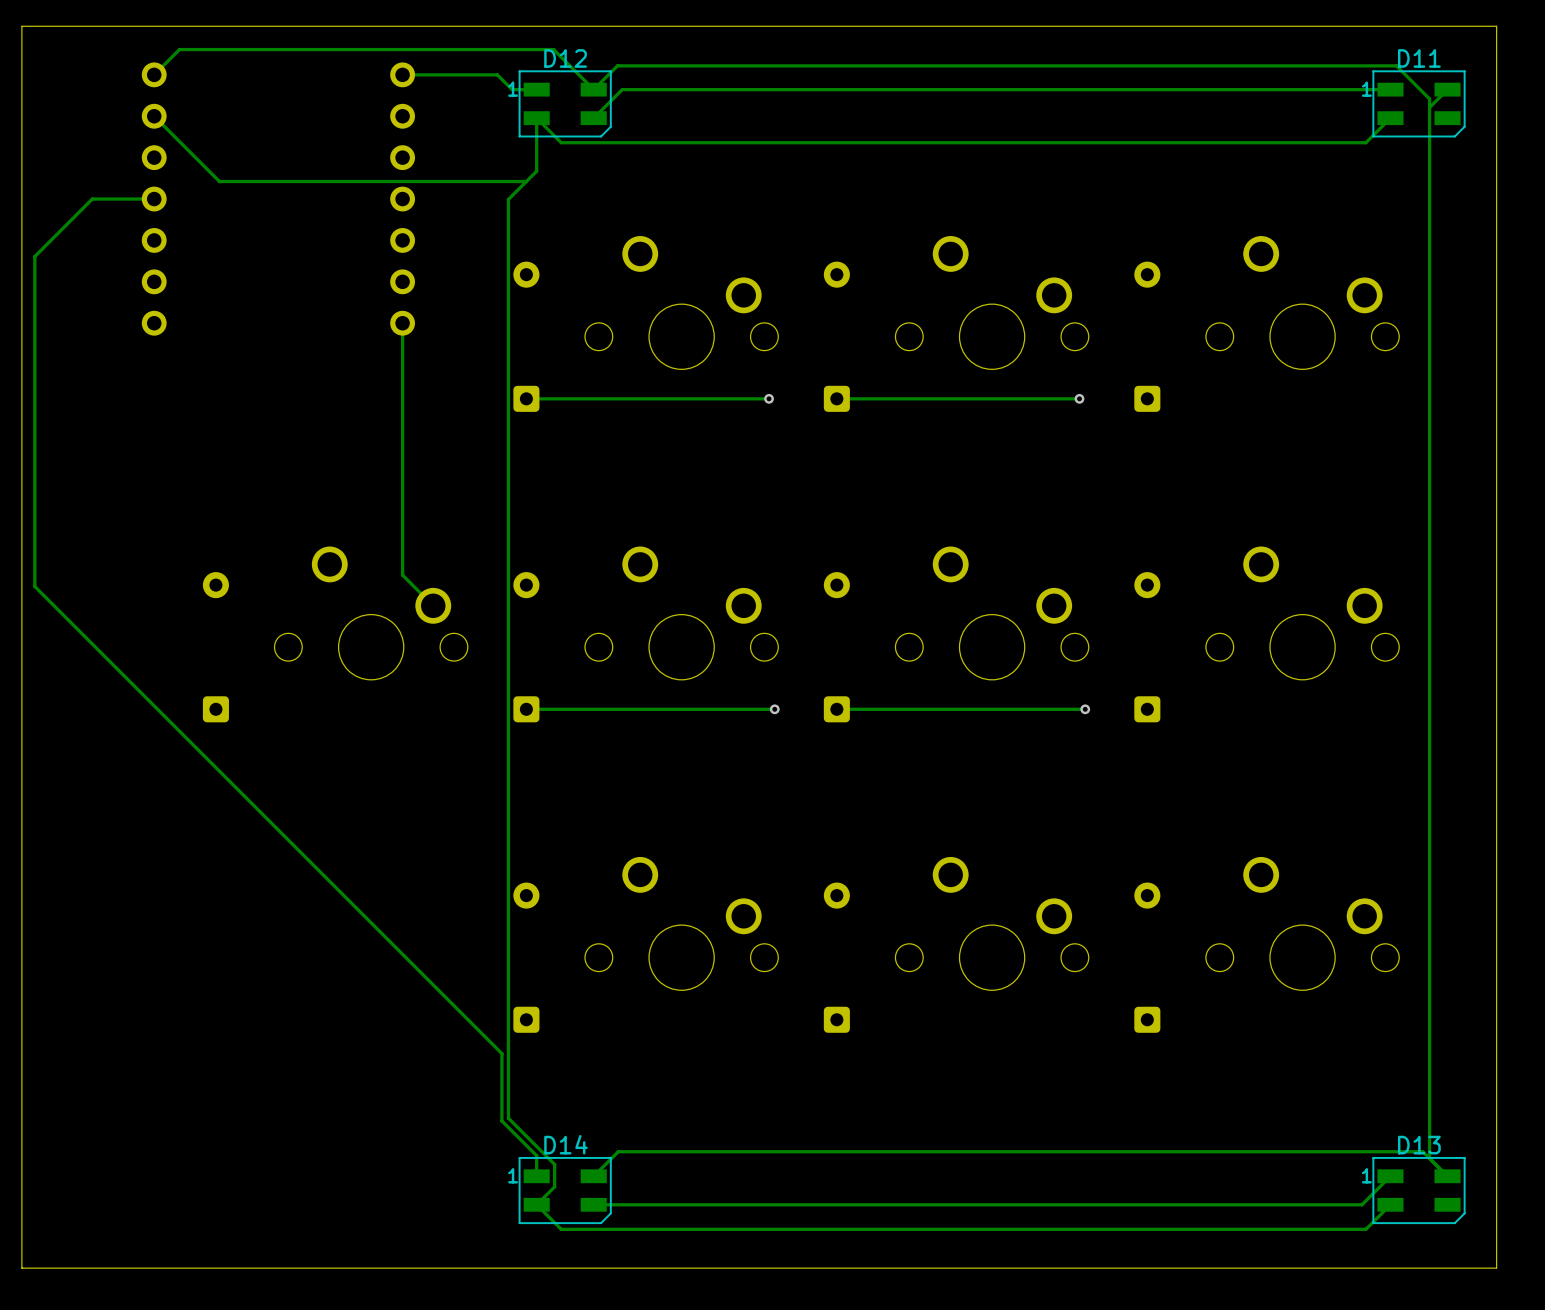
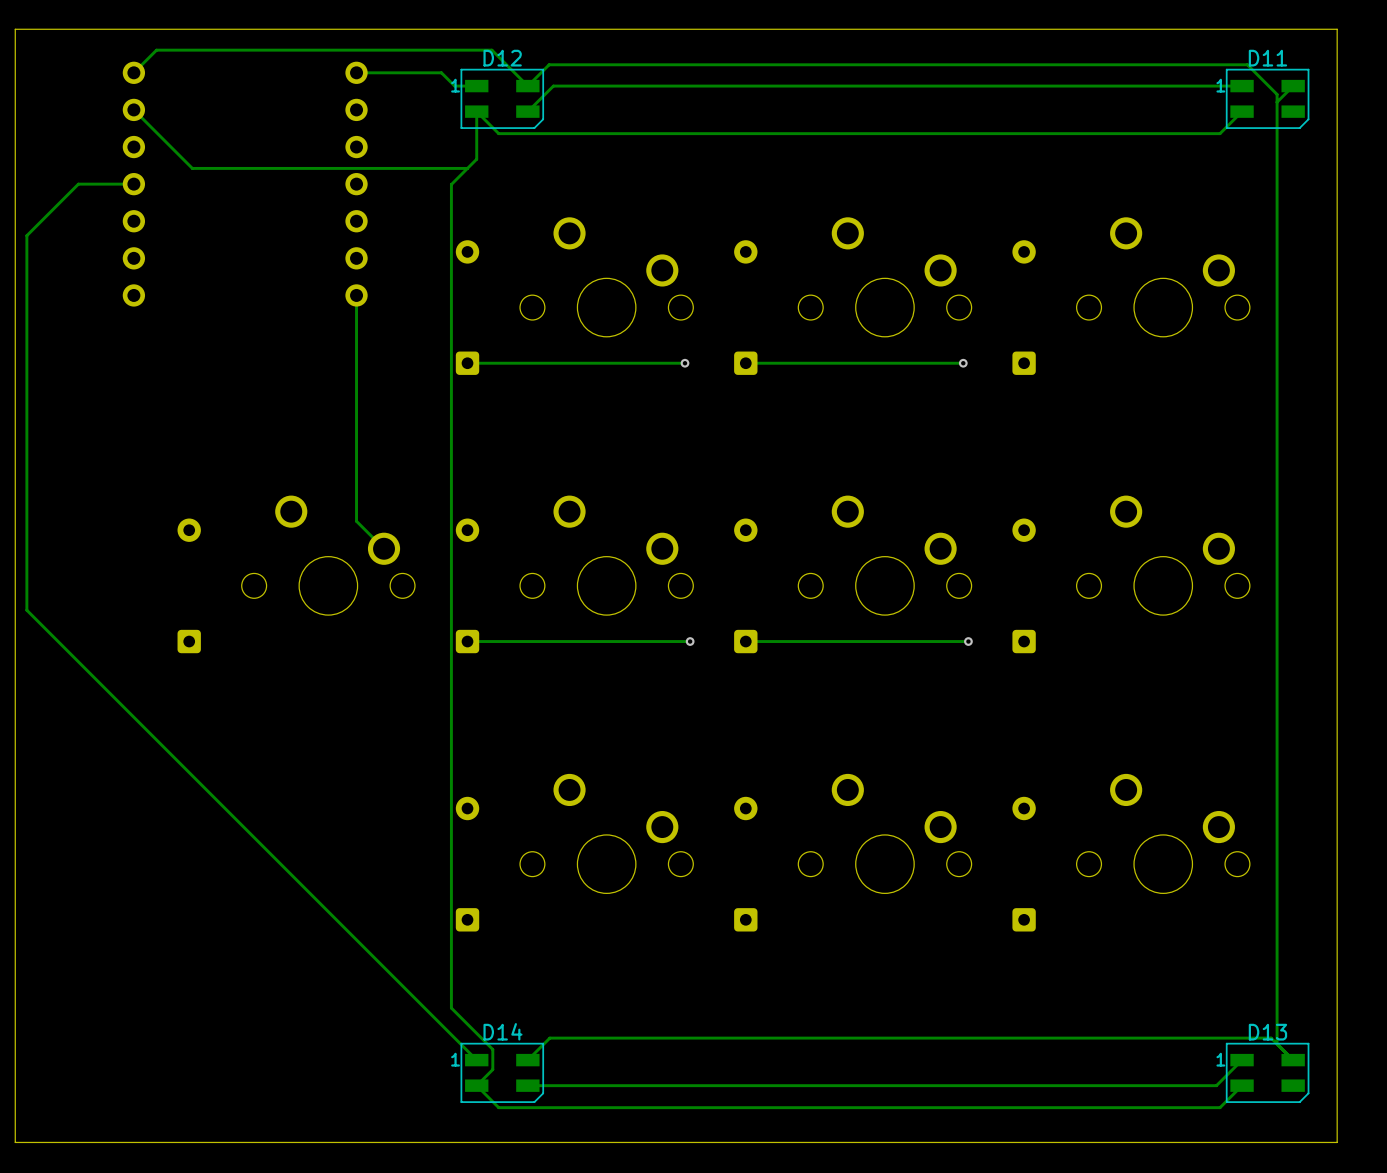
track: (34, 586) (501, 1053) (501, 1120) (536, 1155) (536, 1176) -> (26, 531) (26, 610) (476, 1060)

